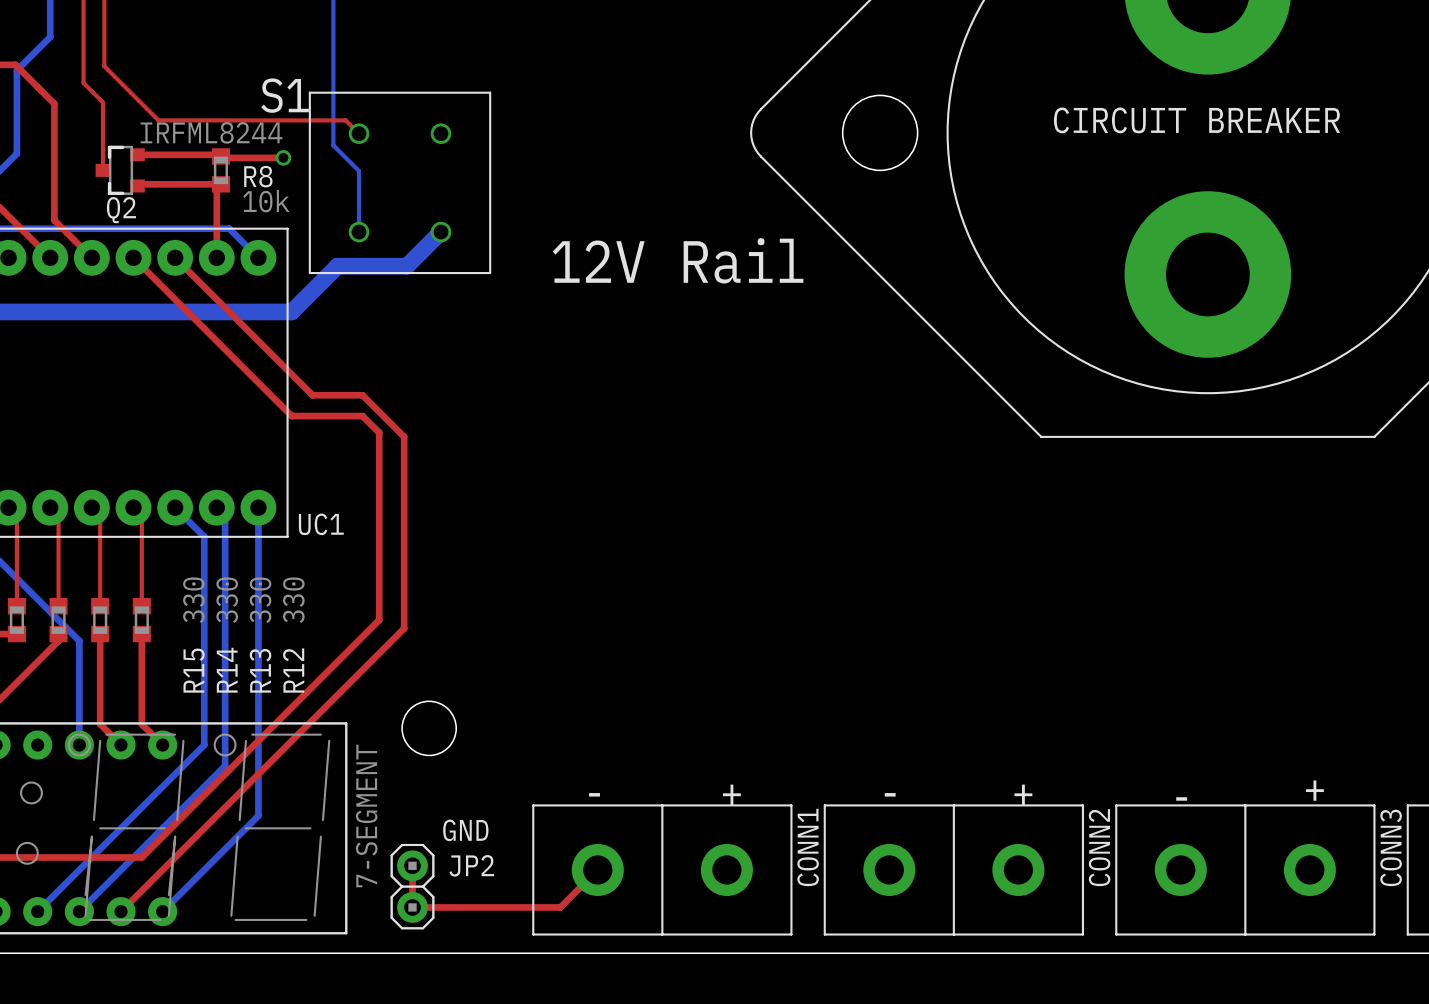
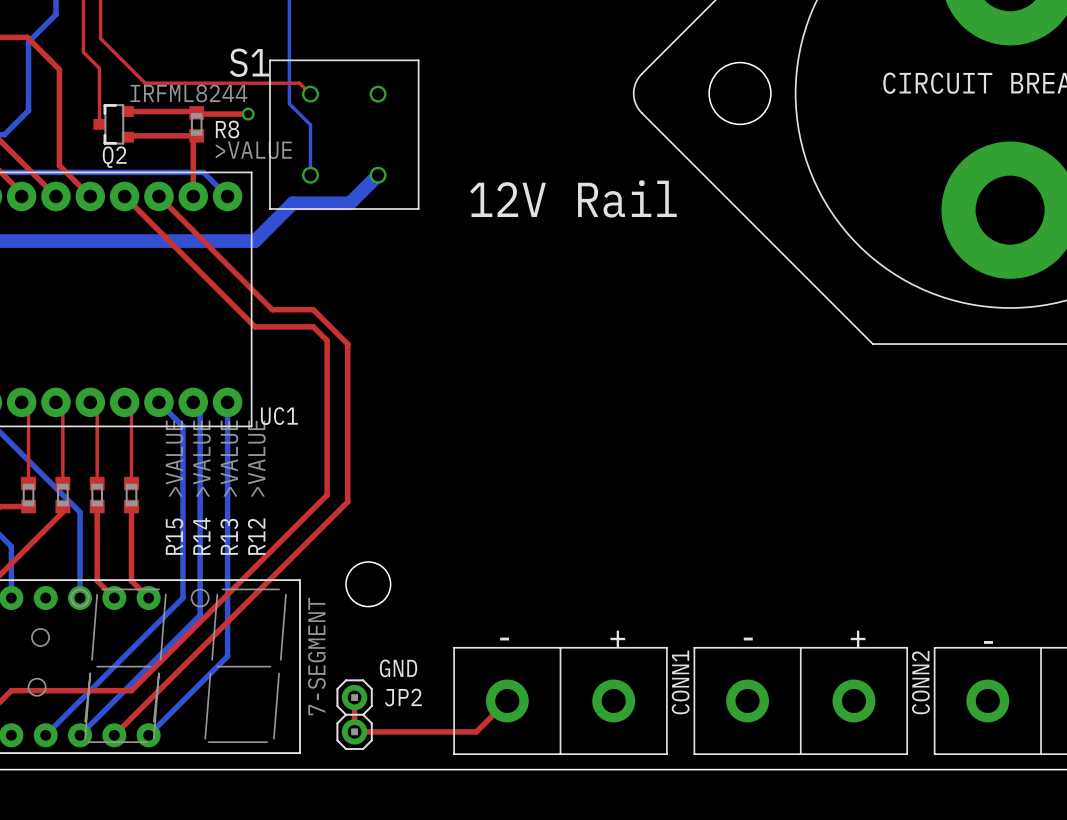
R8 value: 10k (266, 201) -> >VALUE (253, 150)
R15 value: 330 (193, 600) -> >VALUE (174, 458)
R14 value: 330 (227, 600) -> >VALUE (202, 458)
R13 value: 330 (260, 600) -> >VALUE (229, 458)
R12 value: 330 (293, 600) -> >VALUE (256, 458)

